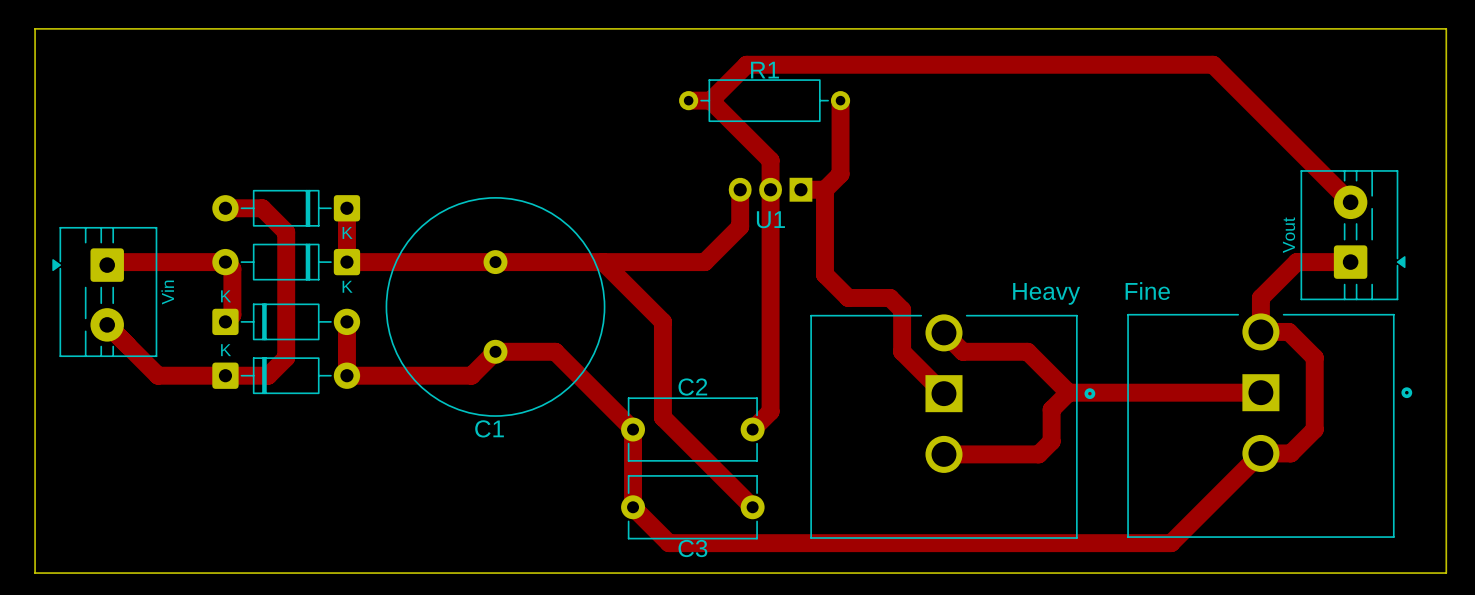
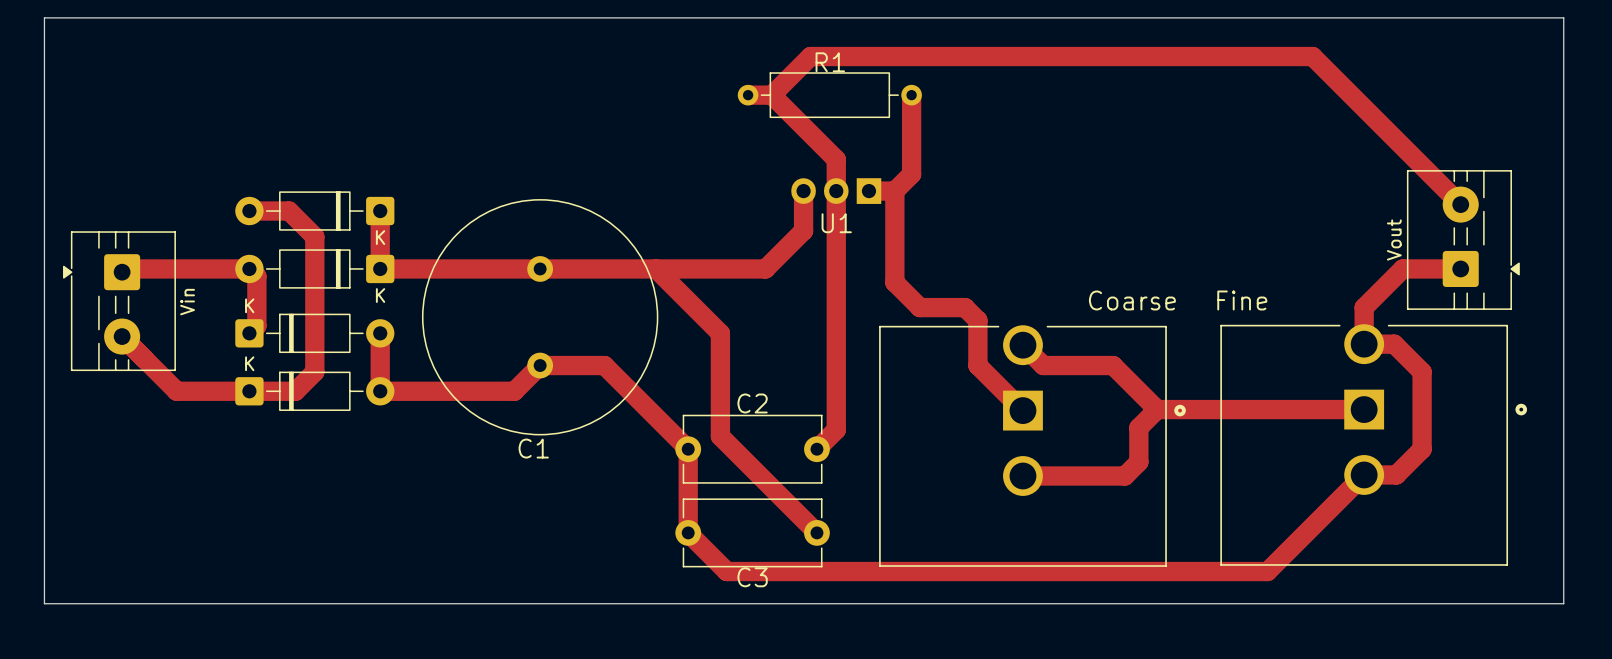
Heavy name: Heavy (1046, 293) -> Coarse (1132, 300)

